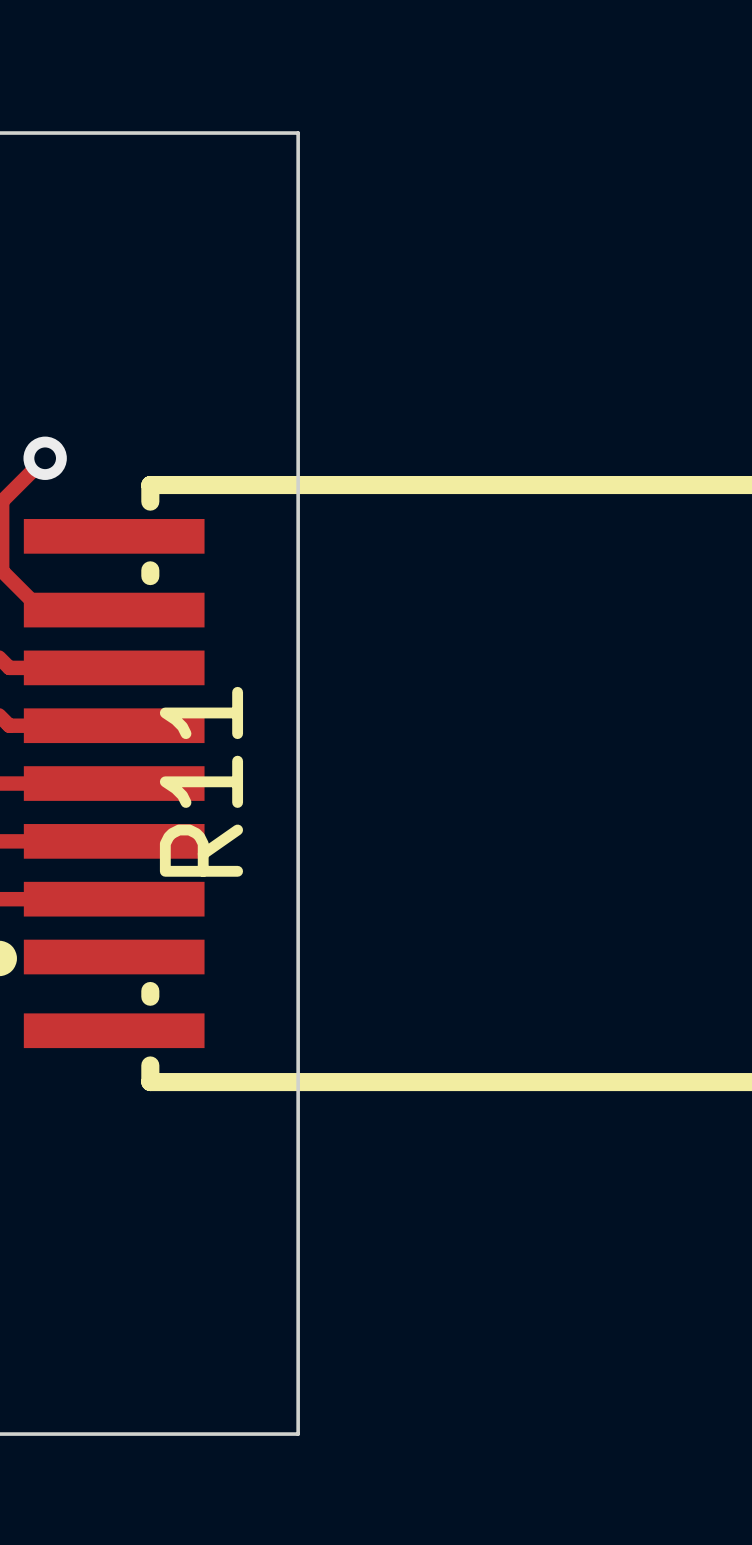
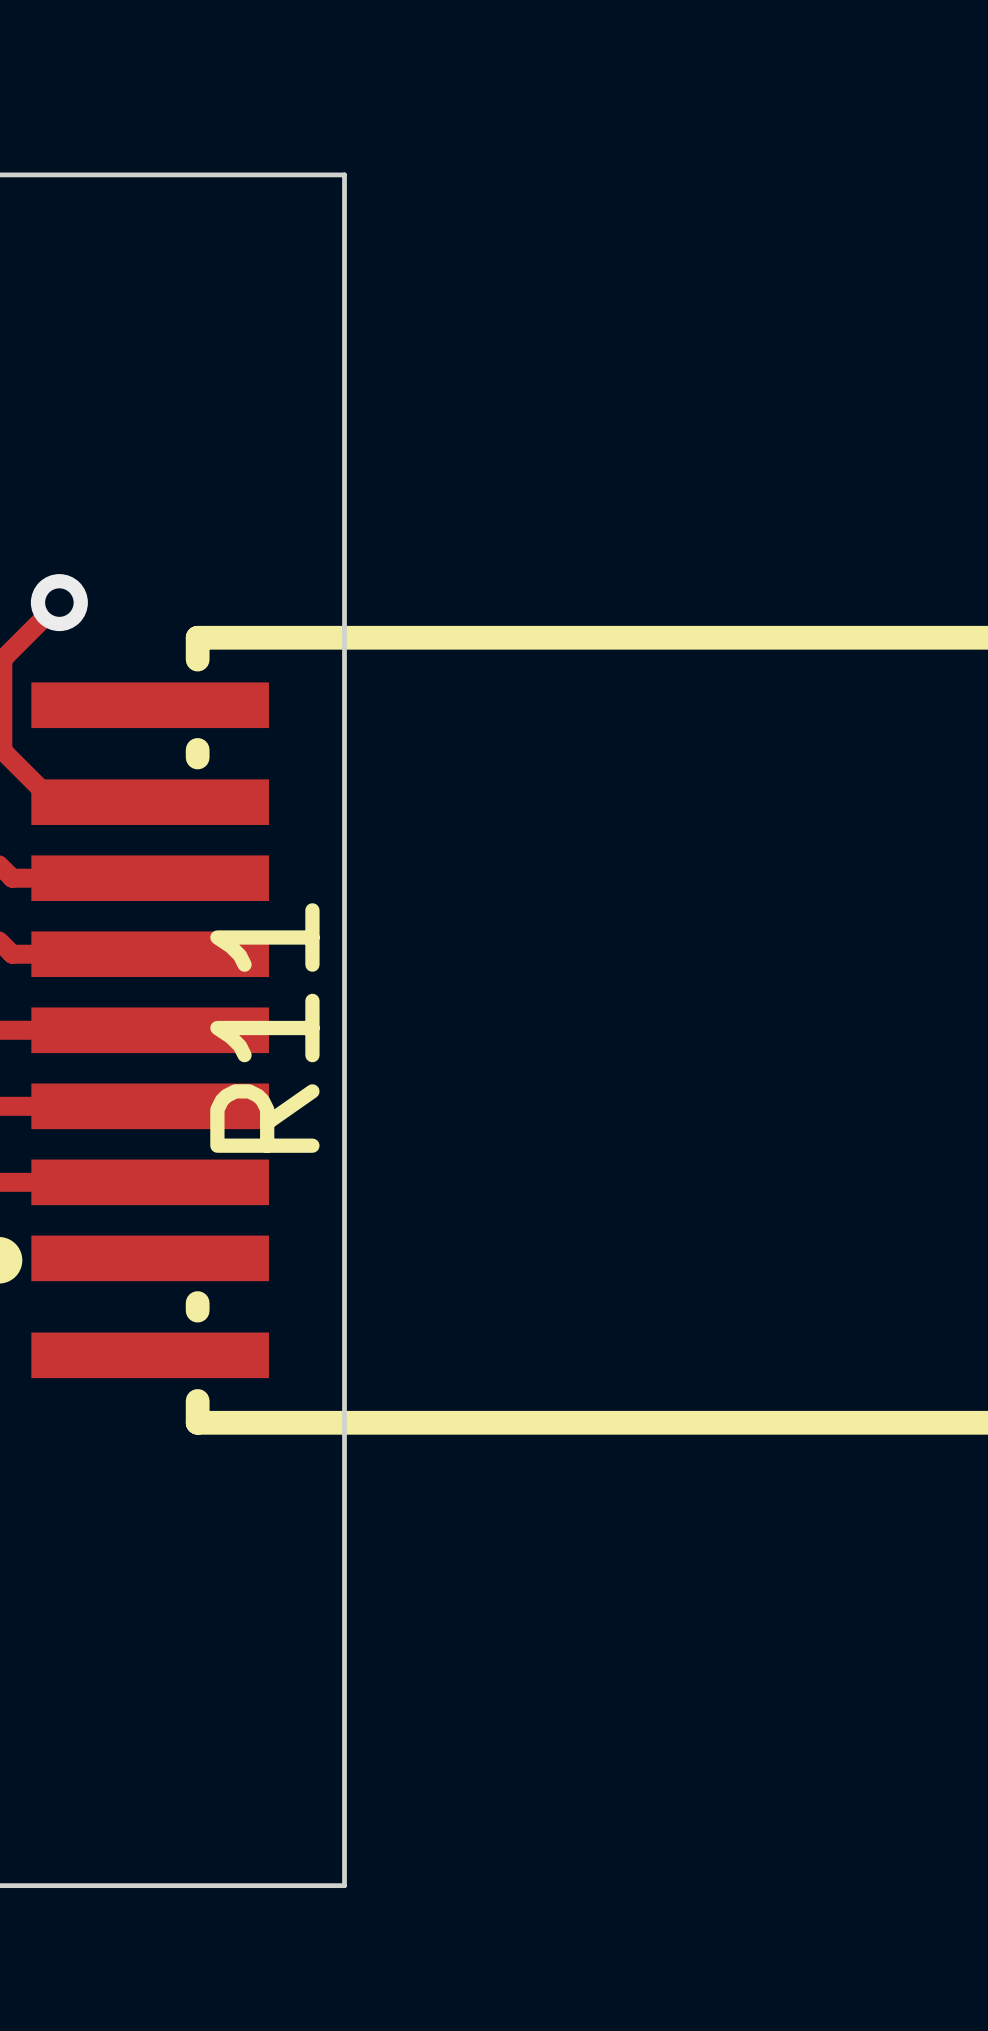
board edge: (262, 133) (298, 133) (298, 1434) (262, 1434) -> (344, 174) (344, 1885)

